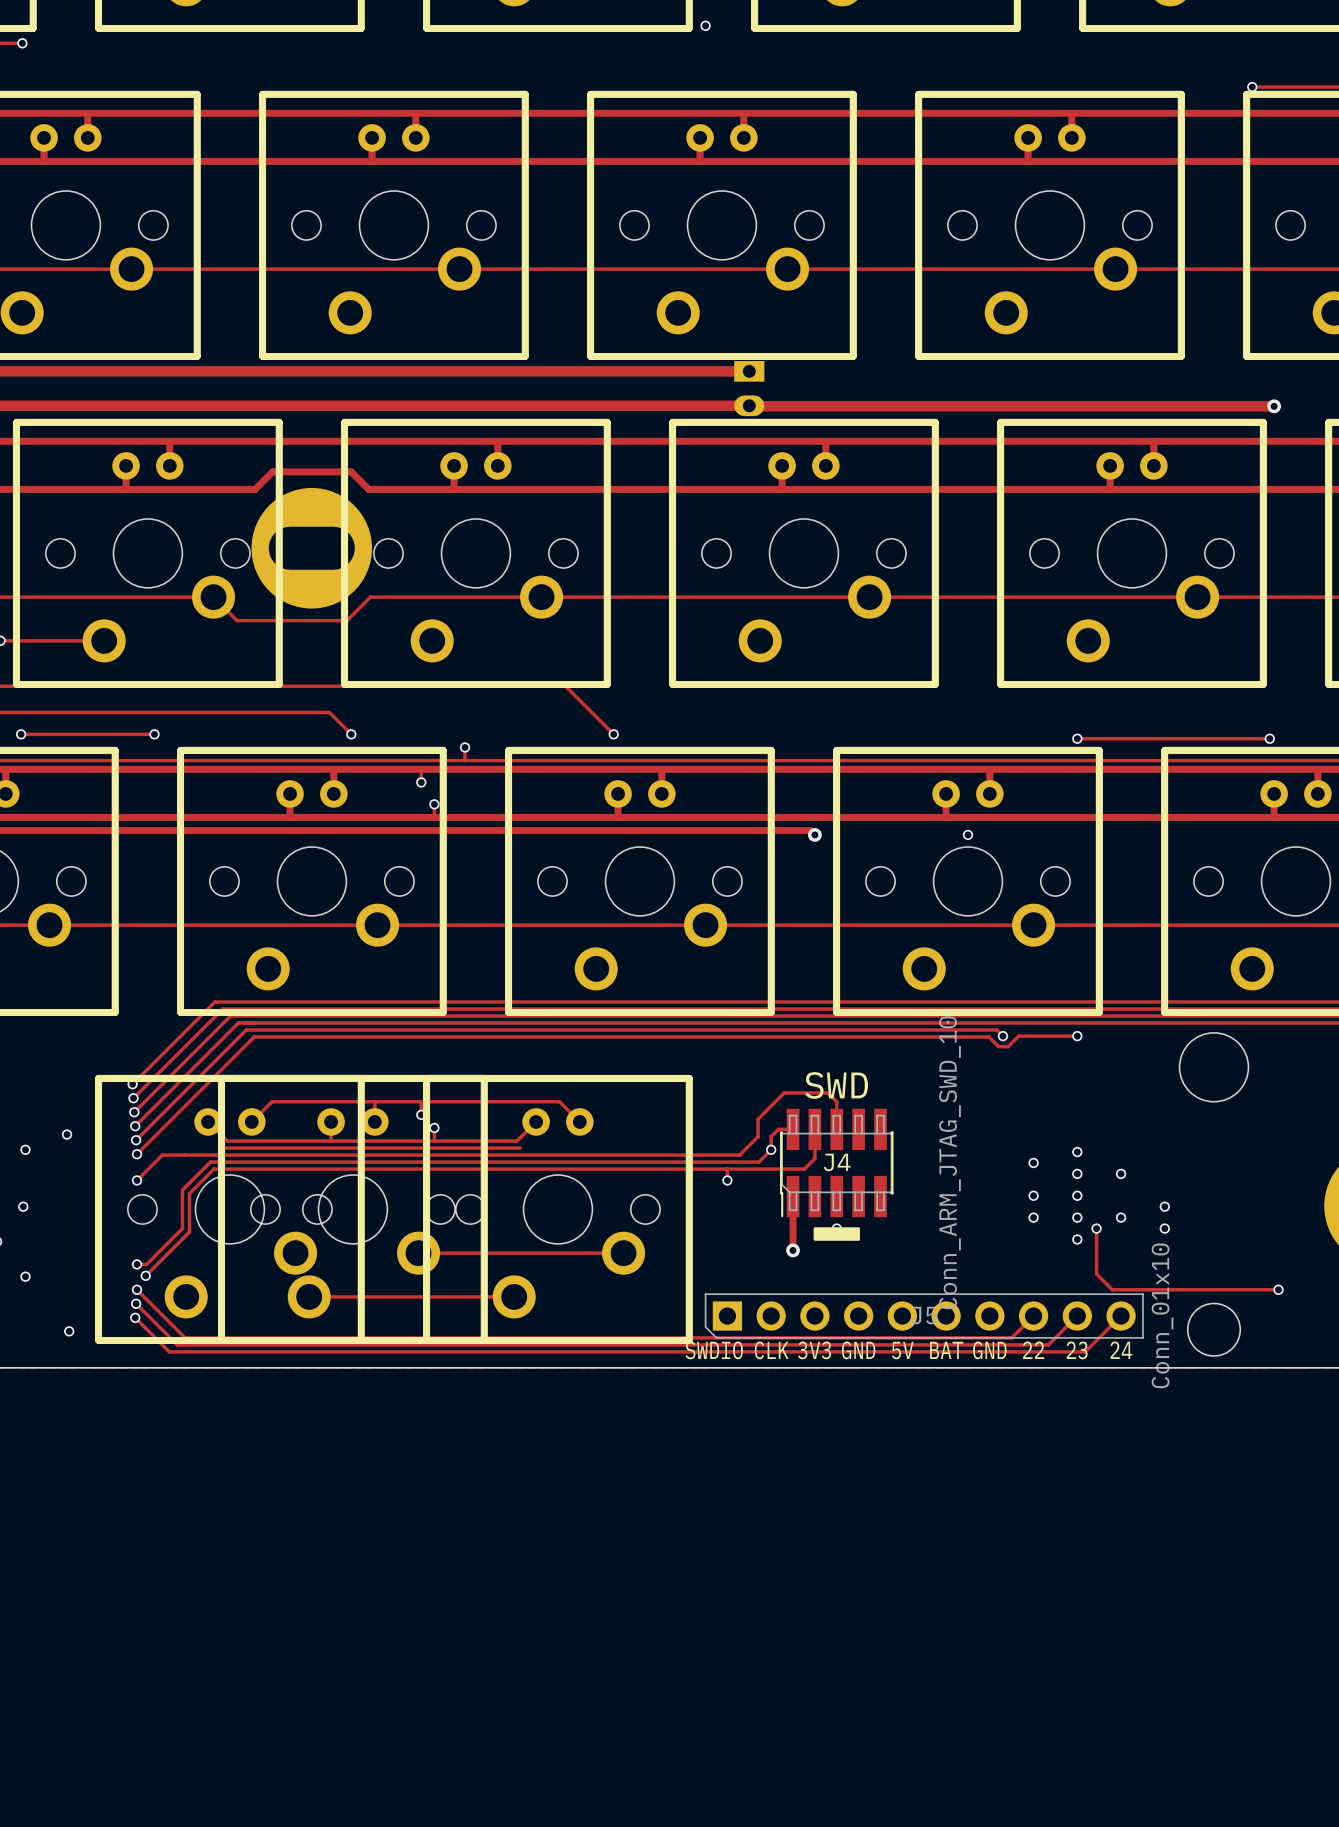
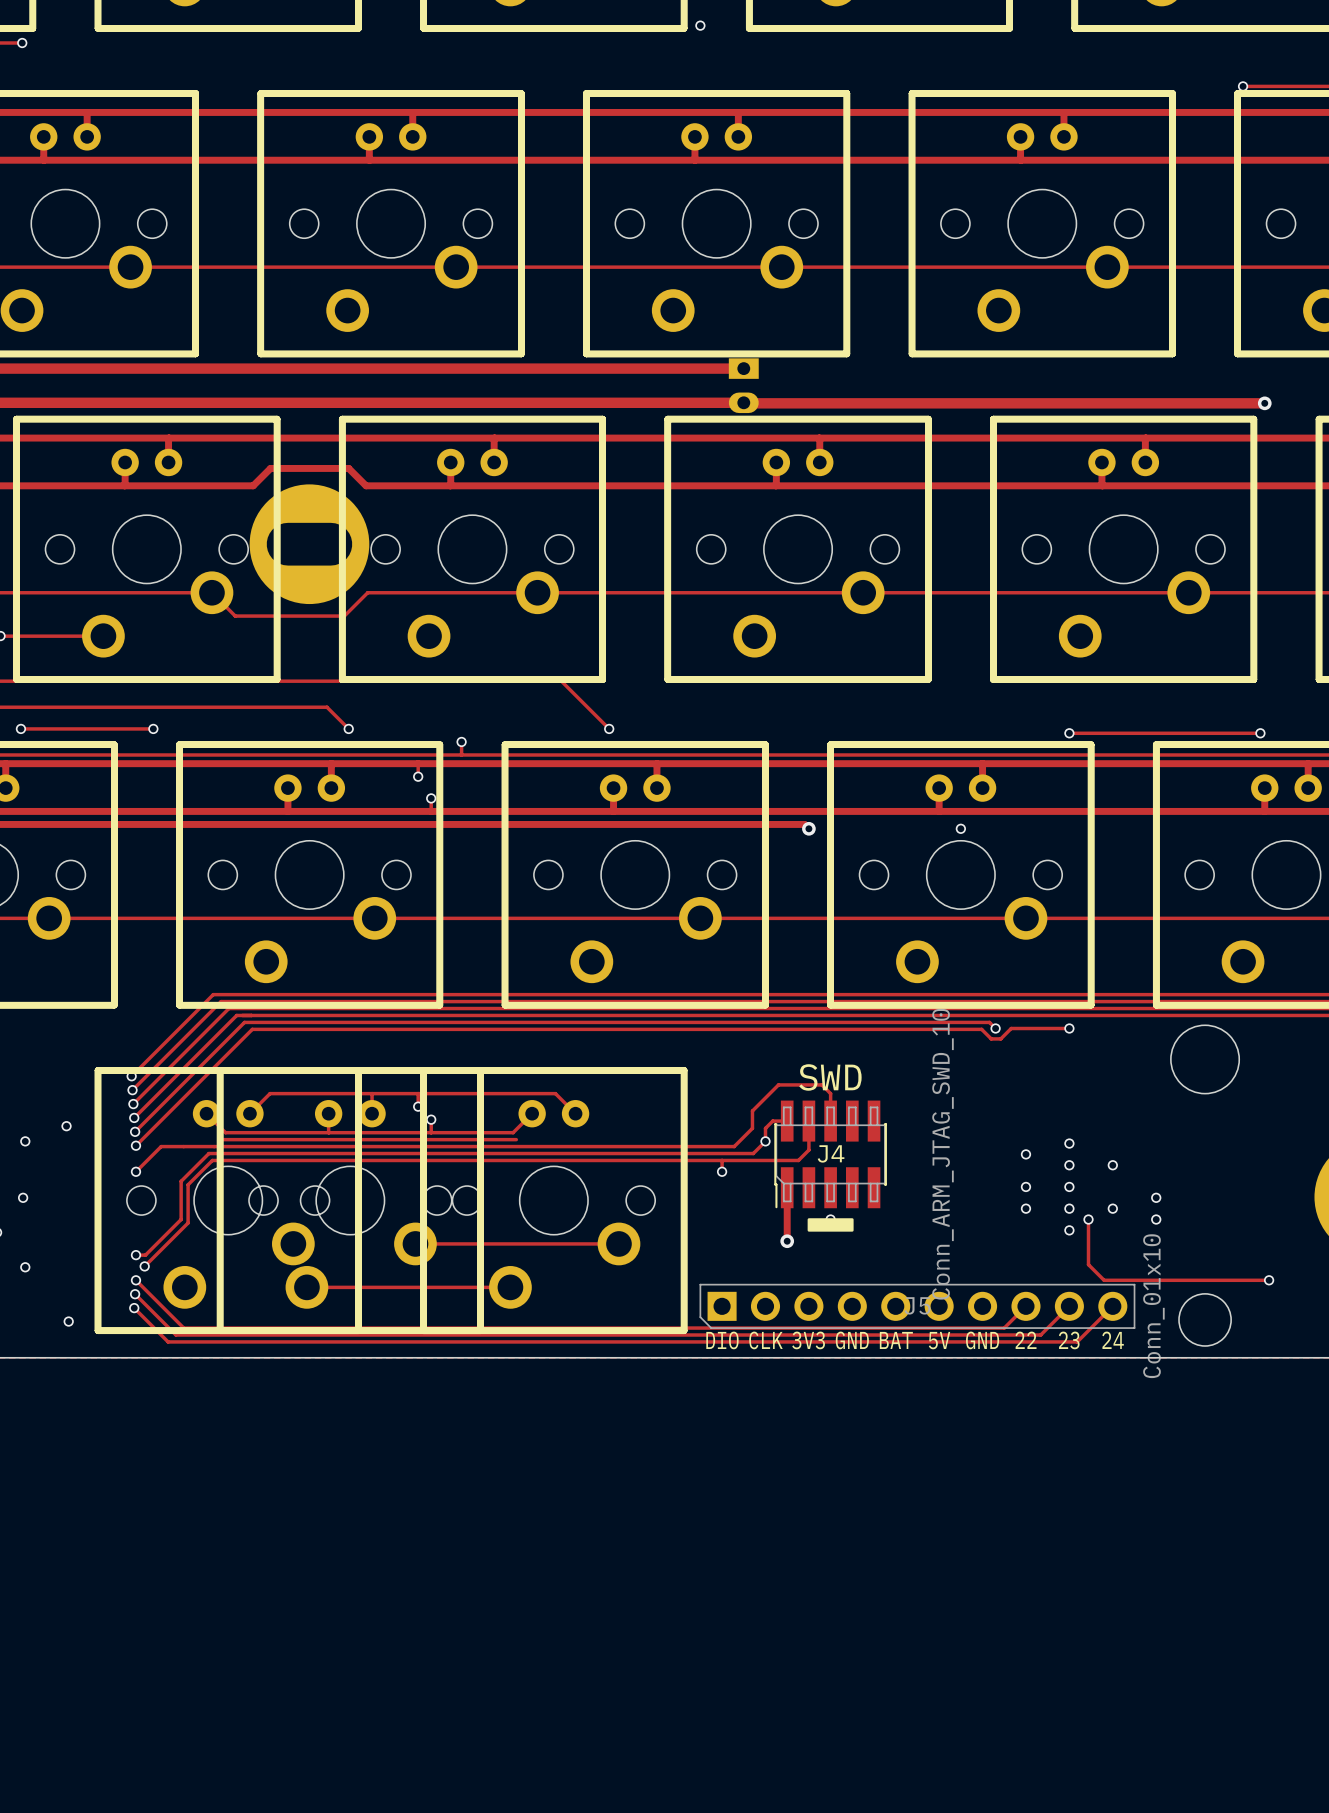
text: SWDIO (714, 1350) -> DIO (722, 1340)
text: 5V (902, 1350) -> BAT (896, 1340)
text: BAT (946, 1350) -> 5V (939, 1340)

